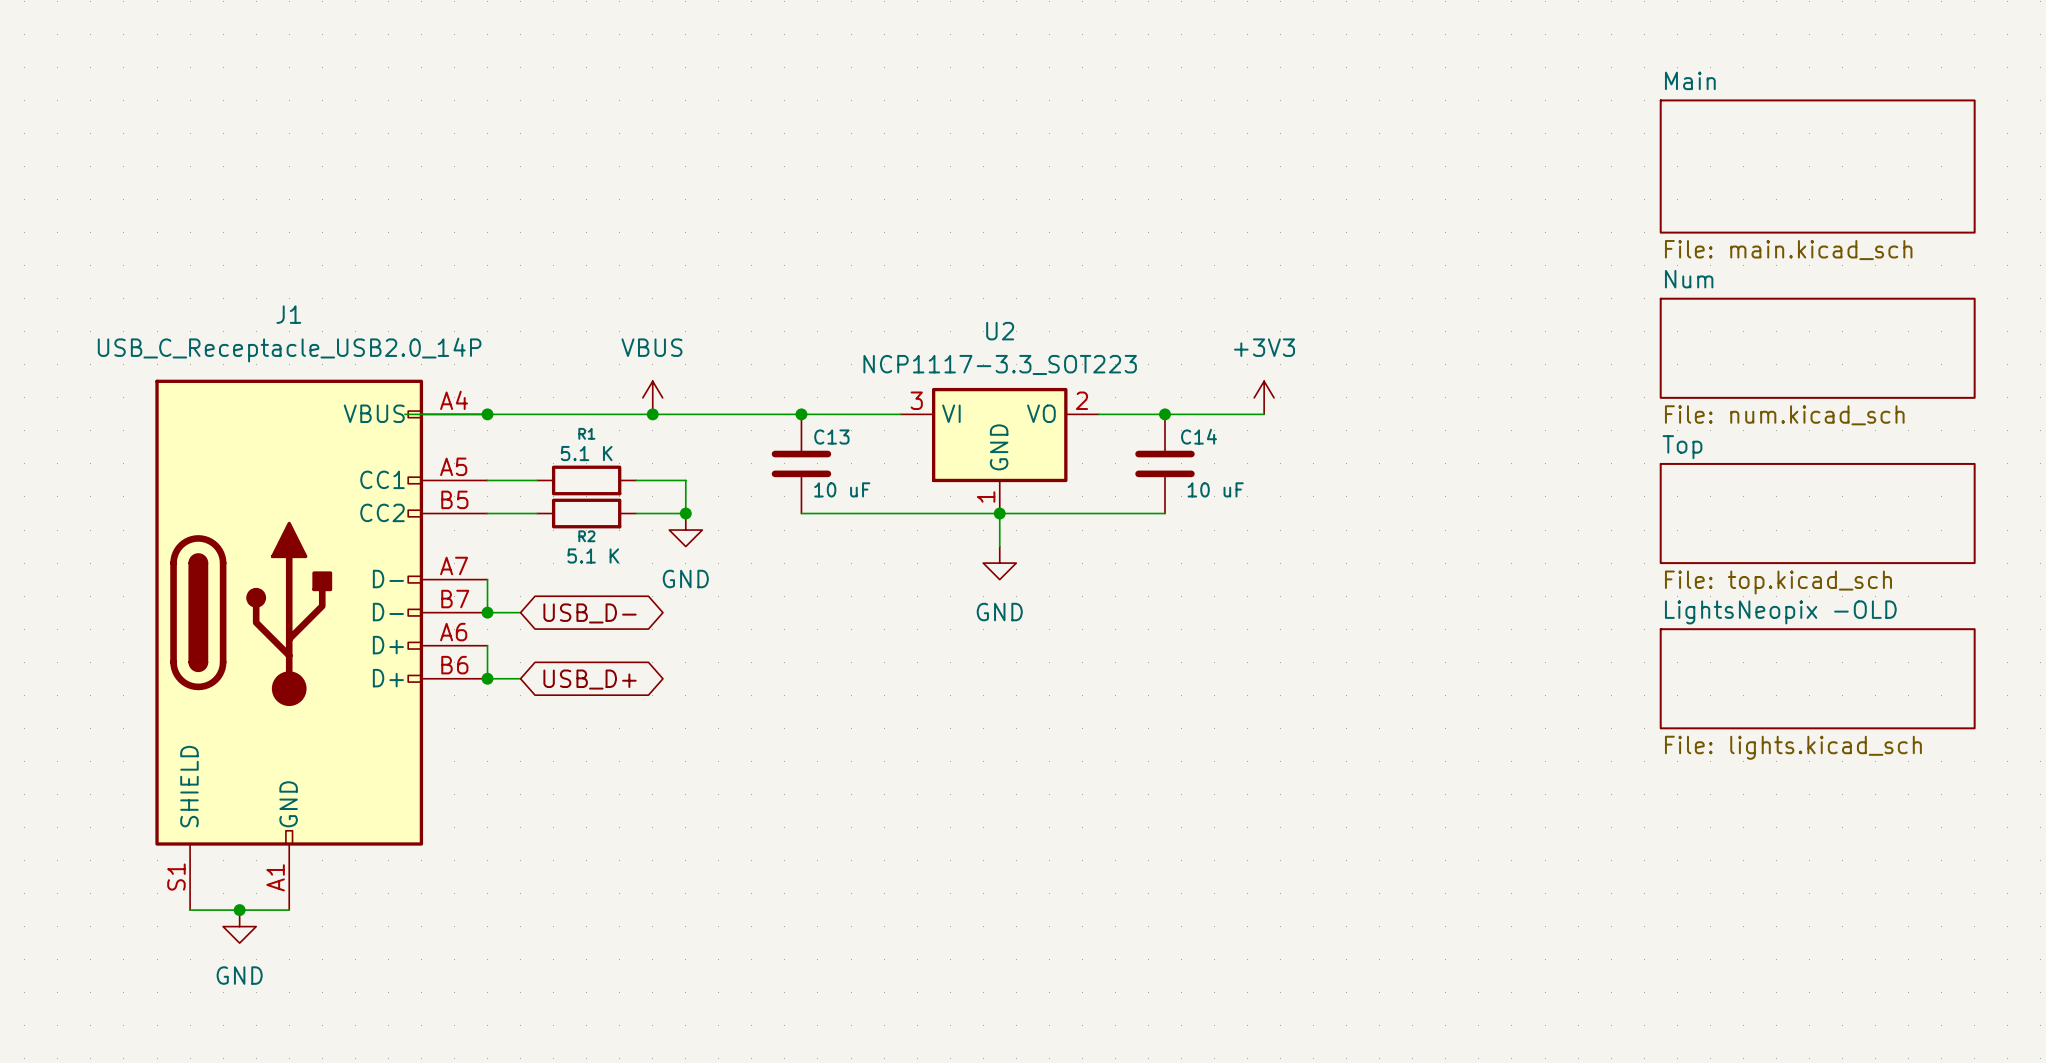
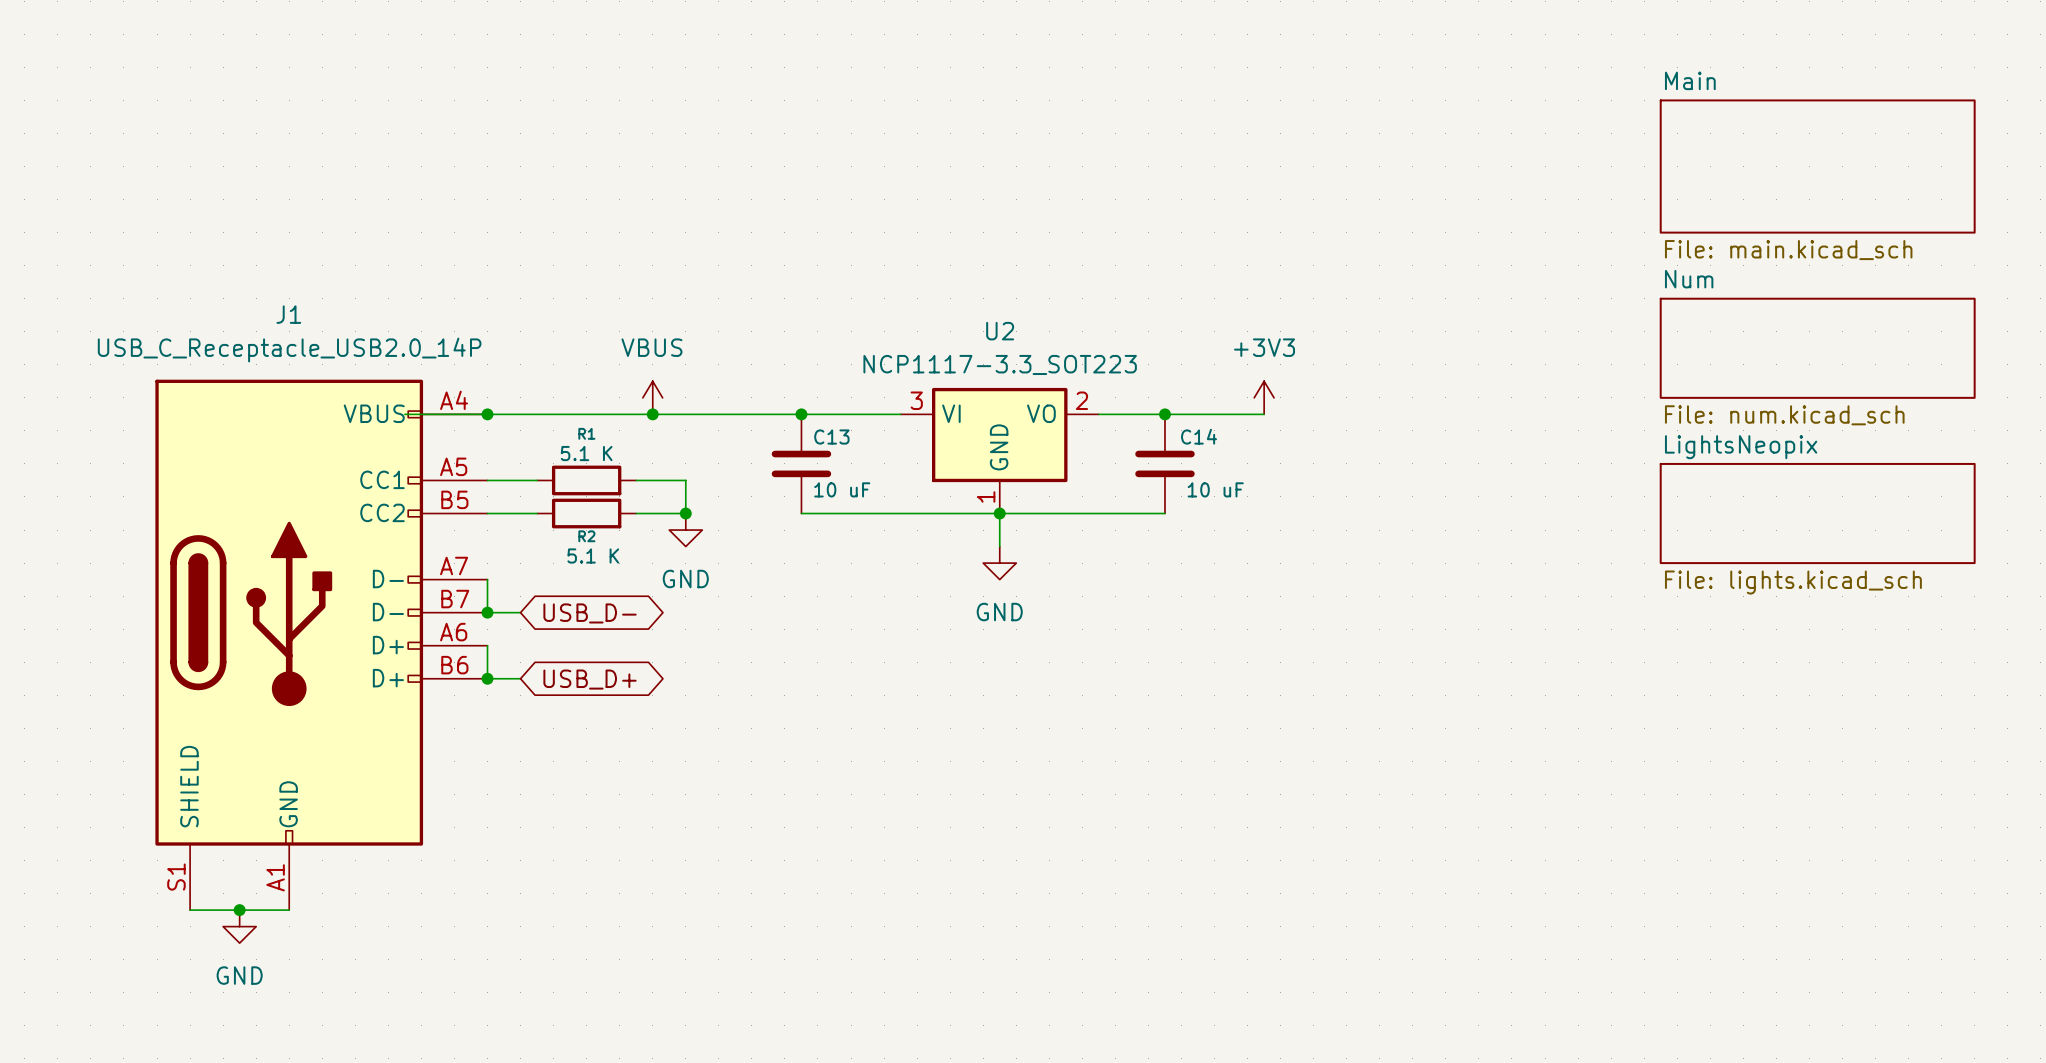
sheet Top name: Top (1682, 447) -> LightsNeopix (1741, 447)
sheet Top value: File: top.kicad_sch (1778, 582) -> File: lights.kicad_sch (1793, 582)
sheet LightsNeopix -OLD: File: lights.kicad_sch (1817, 678) -> none

